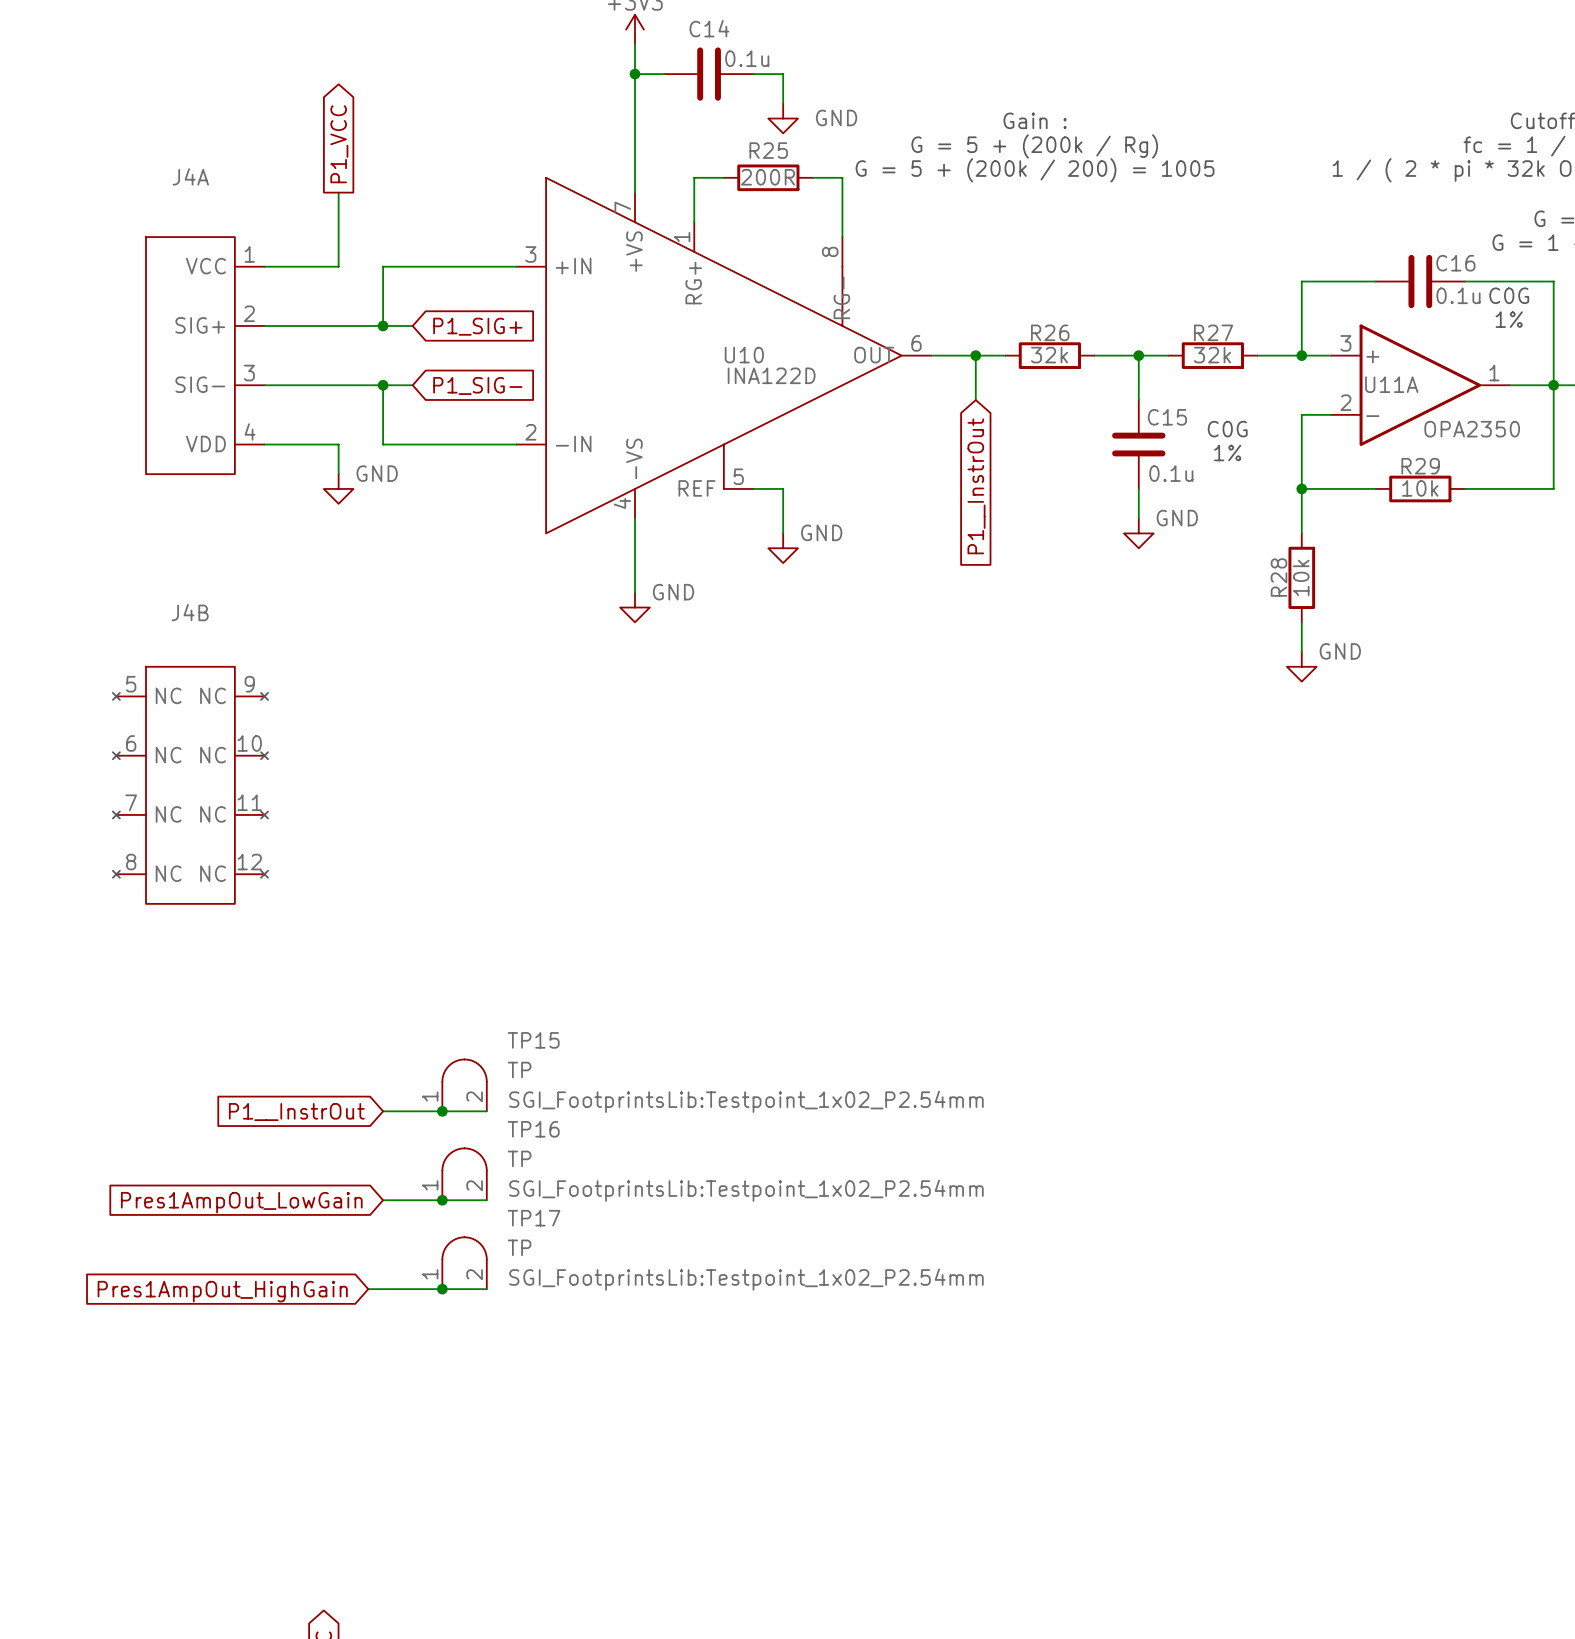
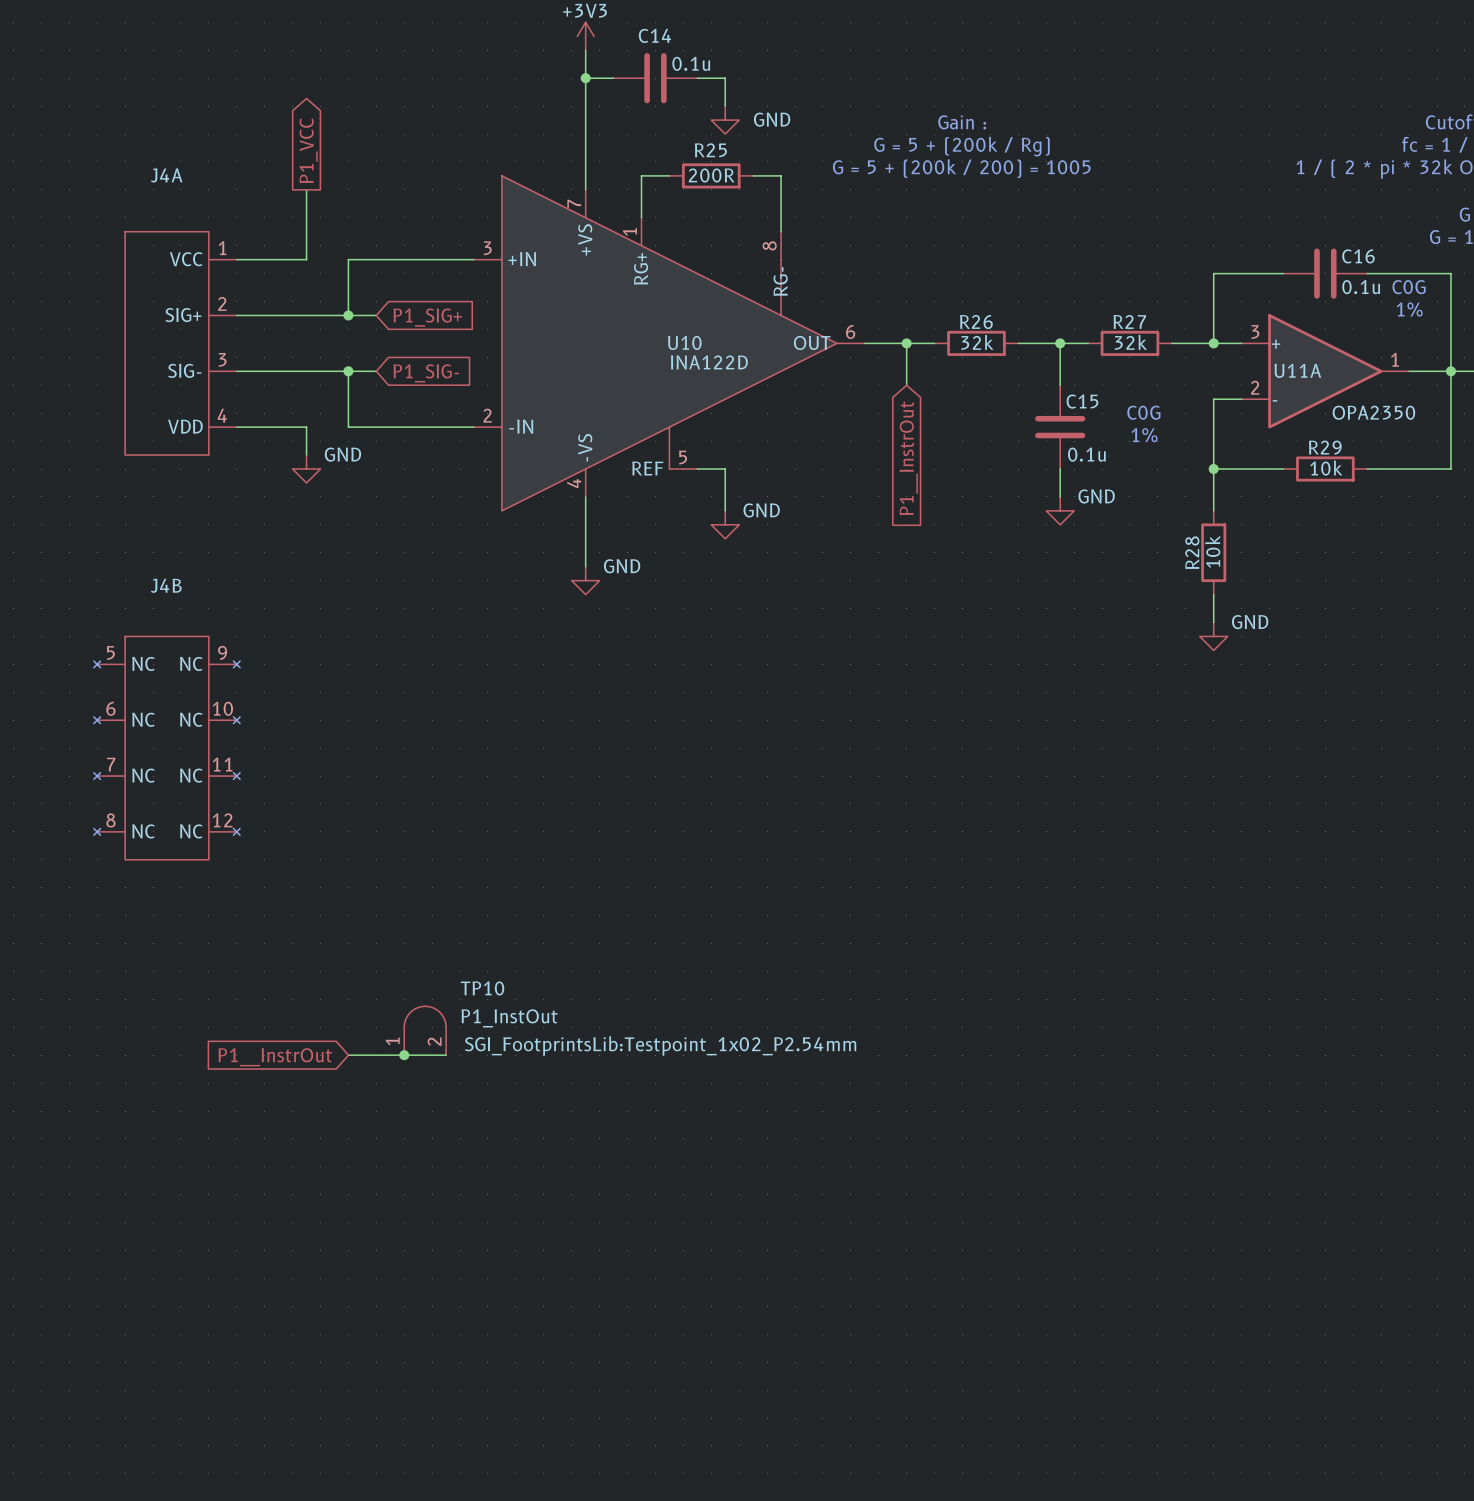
TP15 name: TP15 (533, 1040) -> TP10 (482, 988)
TP15 value: TP (519, 1070) -> P1_InstOut (509, 1018)
TP16: TP (464, 1174) -> none
wire: (383, 1200) (486, 1200) -> none
junction: (442, 1200) -> none
global label: Pres1AmpOut_LowGain (241, 1202) -> none
TP17: TP (464, 1263) -> none
wire: (368, 1289) (486, 1289) -> none
junction: (442, 1289) -> none
global label: Pres1AmpOut_HighGain (222, 1291) -> none

